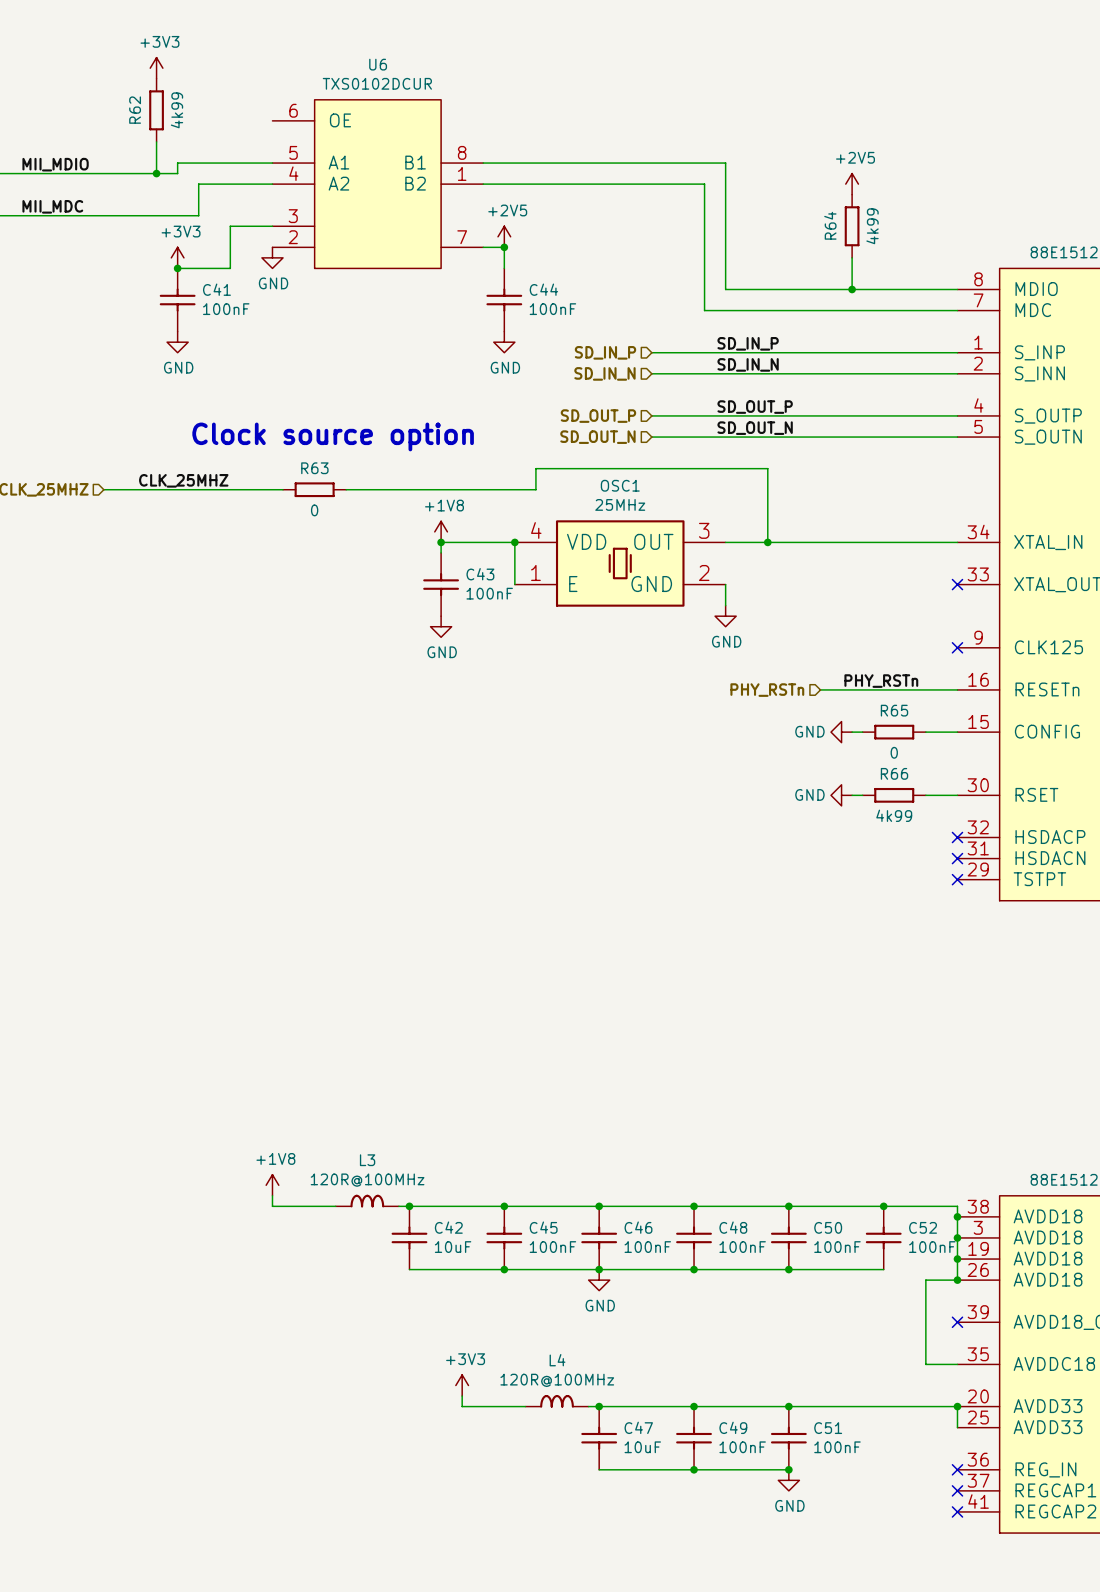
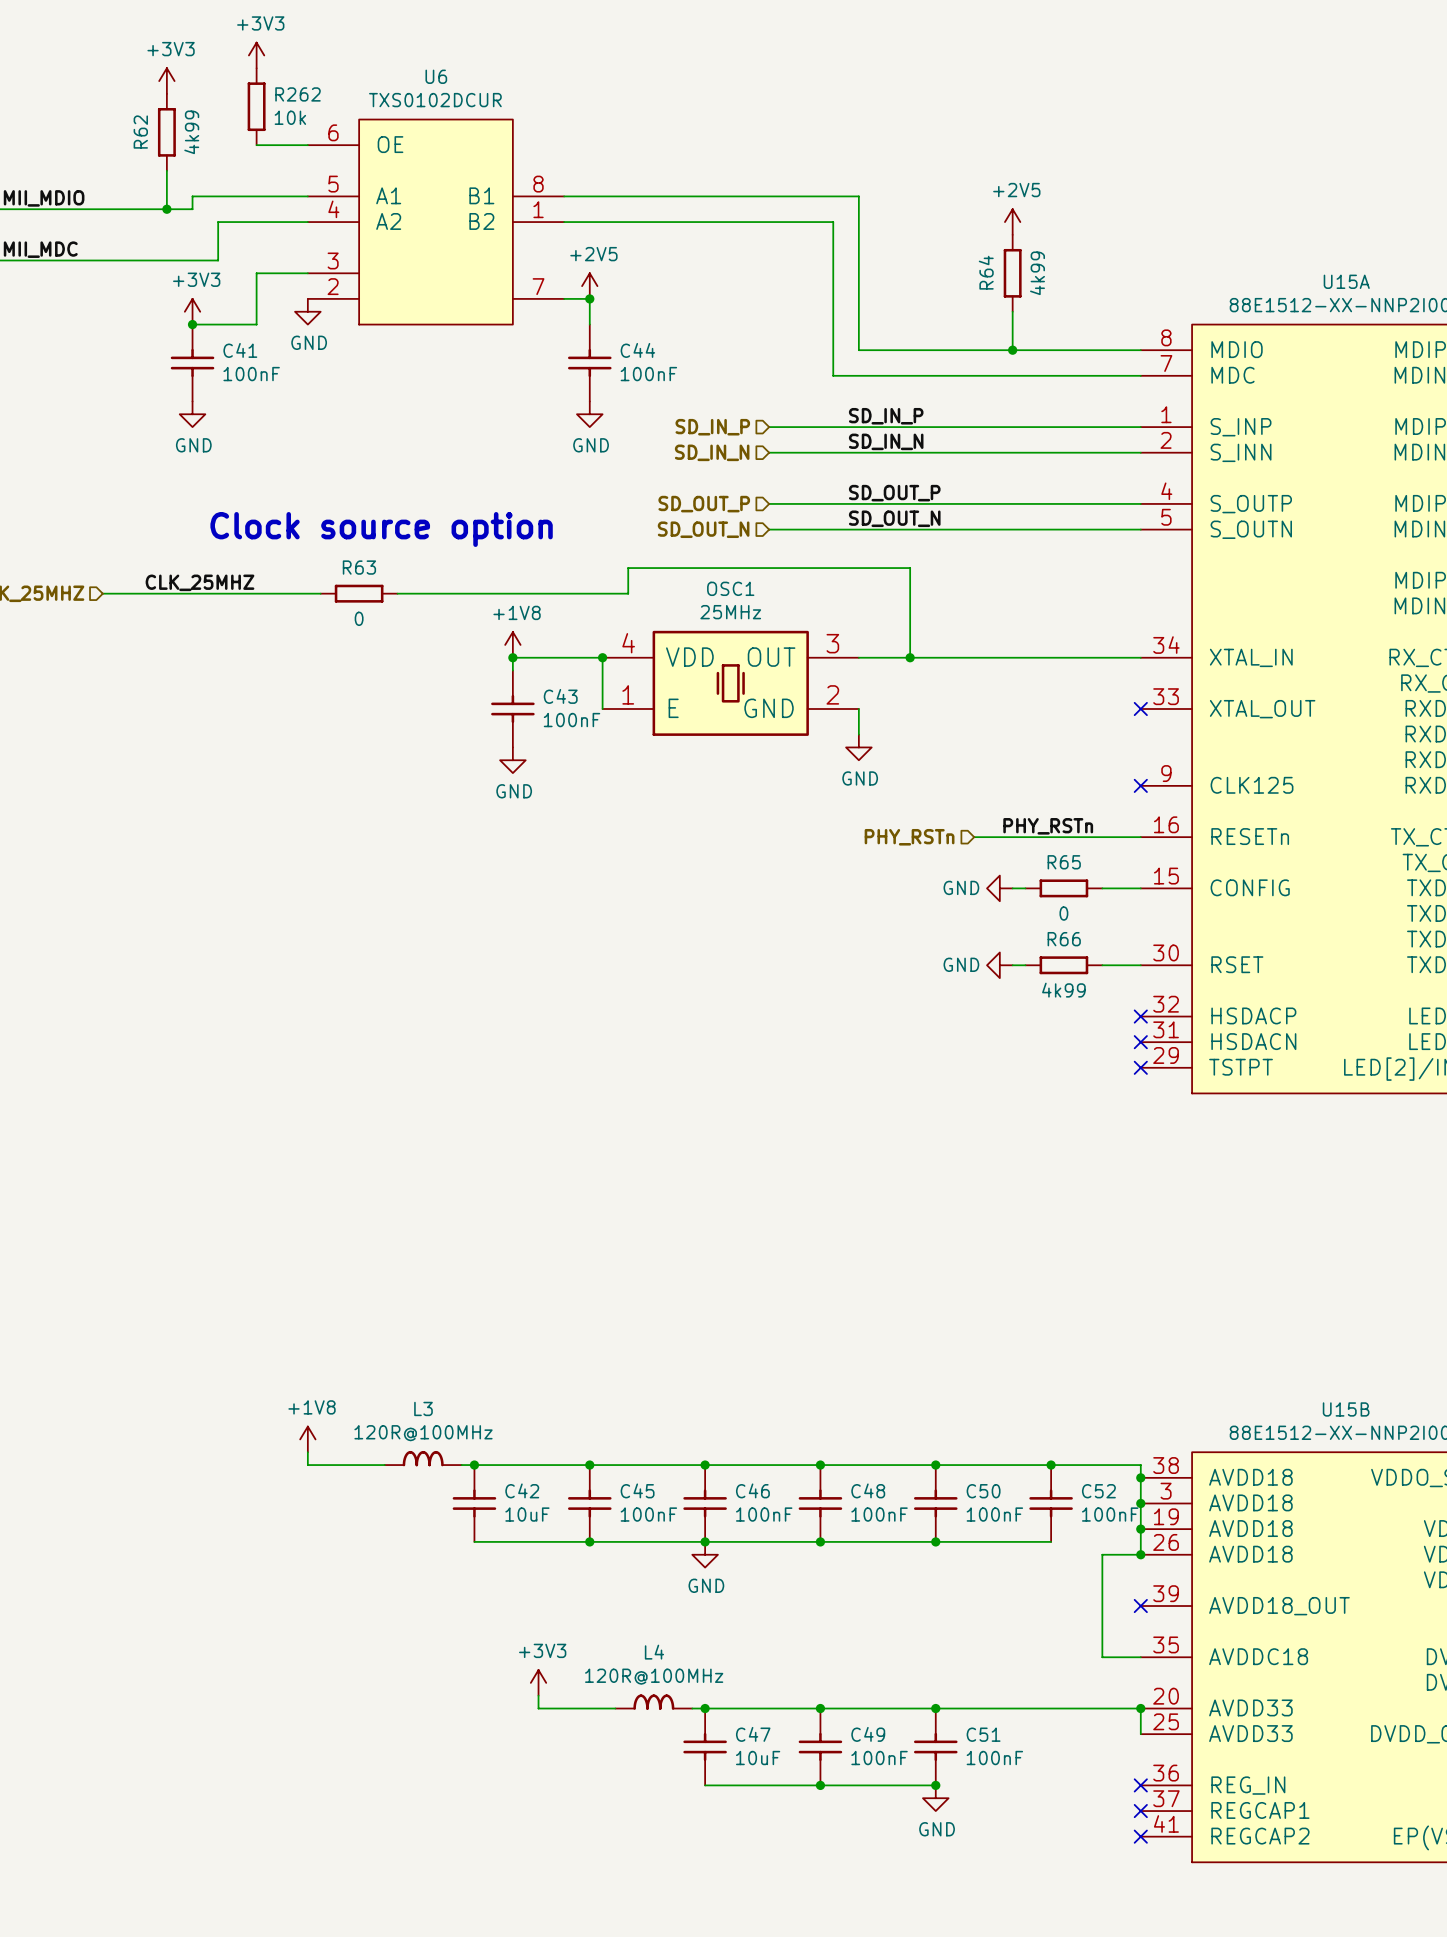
power symbol: none -> +3V3 (256, 55)
R262: none -> (256, 106)
wire: none -> (256, 145) (307, 145)

